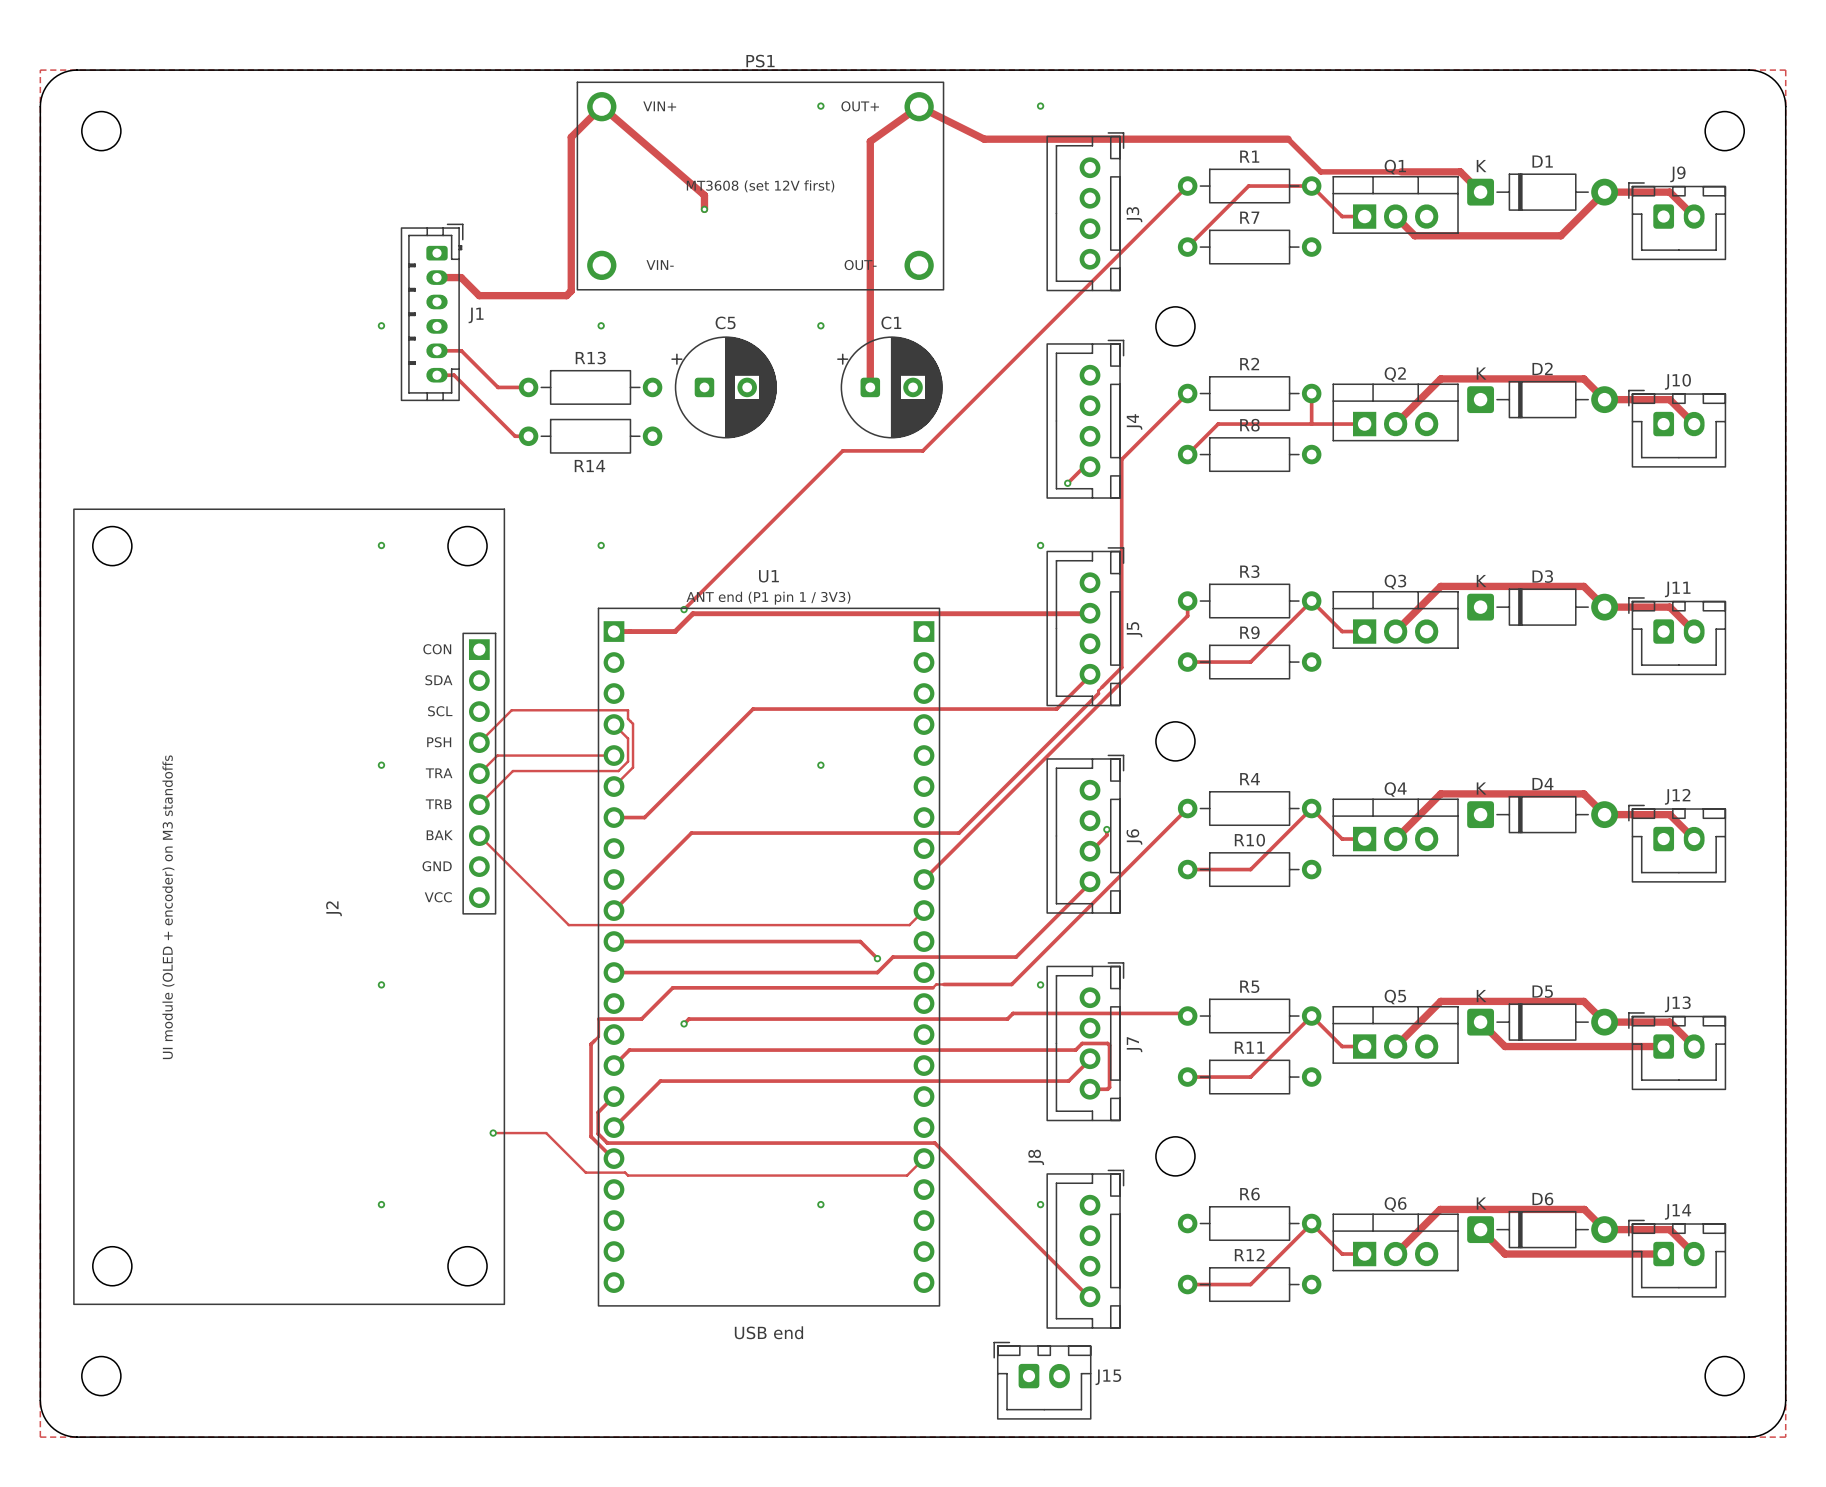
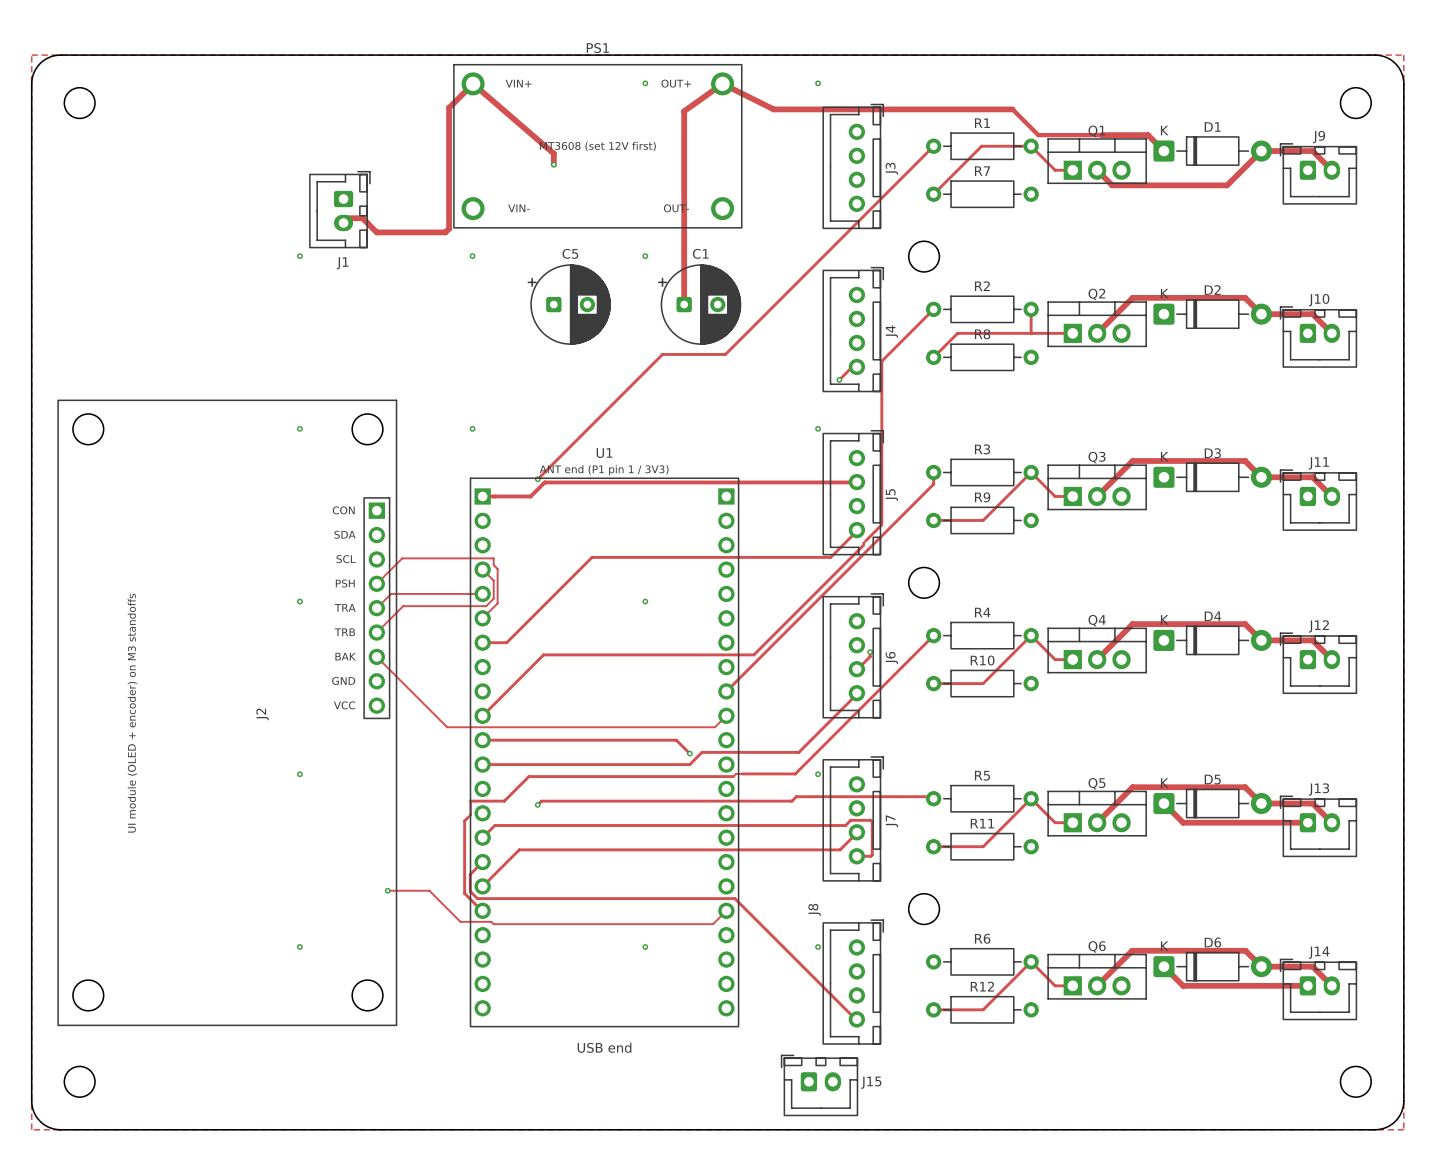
J1 footprint: [400, 223, 464, 402] -> [309, 171, 371, 249]
J1 name position: J1 (476, 315) -> J1 (342, 263)
track: (437, 350) (461, 350) (498, 387) (528, 387) -> none
track: (437, 375) (454, 375) (515, 436) (528, 436) -> none
R13: (590, 387) -> none
R14: (590, 436) -> none

